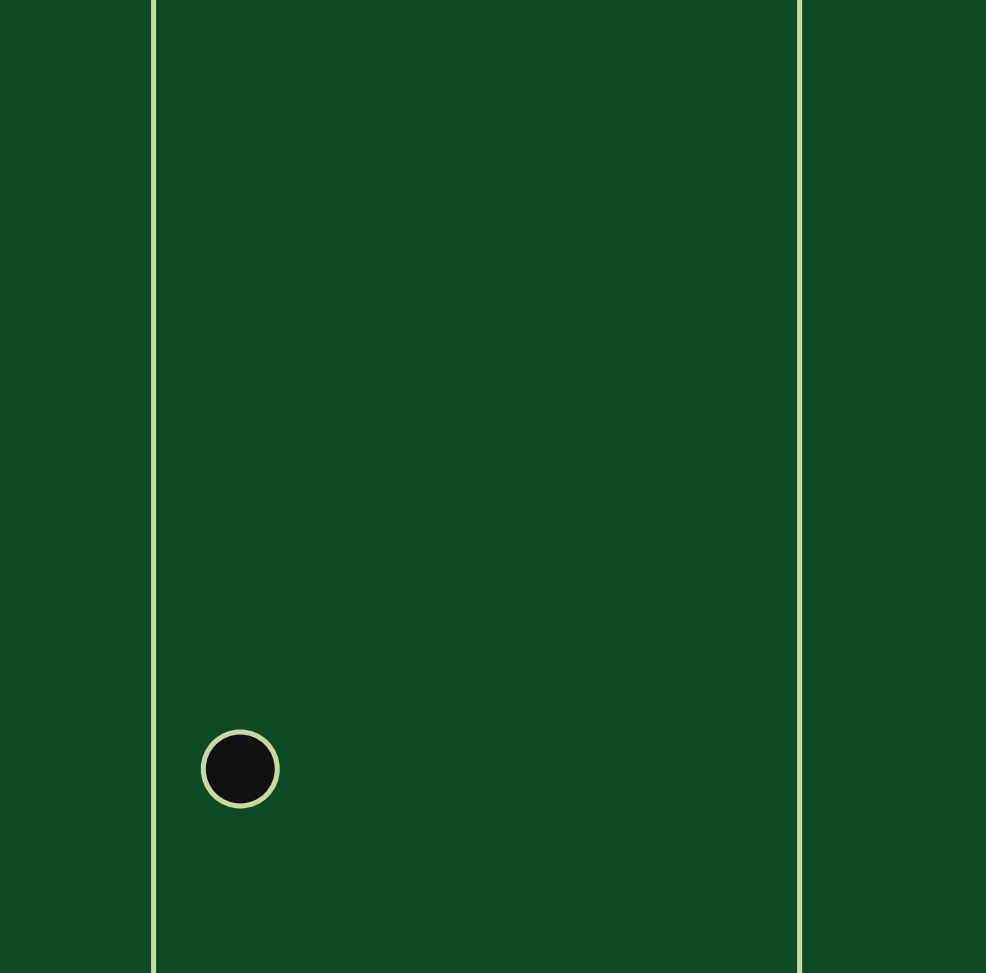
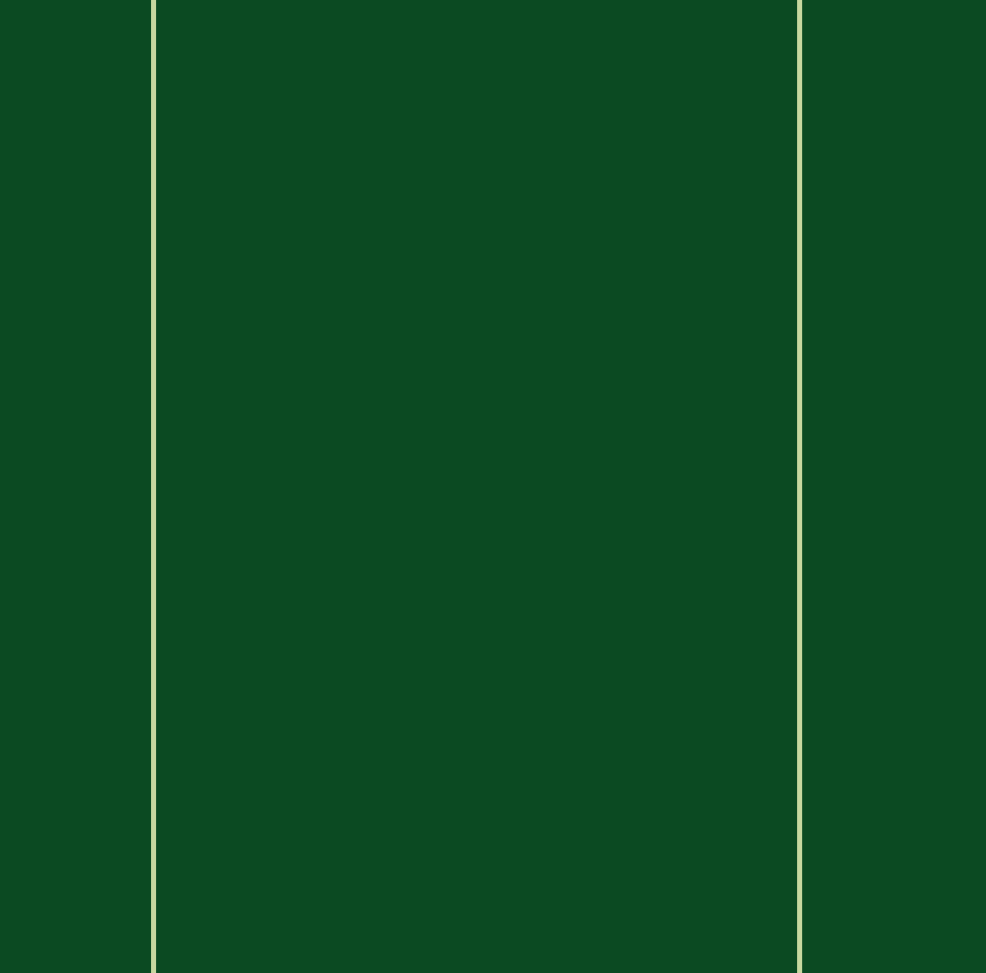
round board edge: [200, 729, 280, 809] -> none
part: (240, 768) -> none

